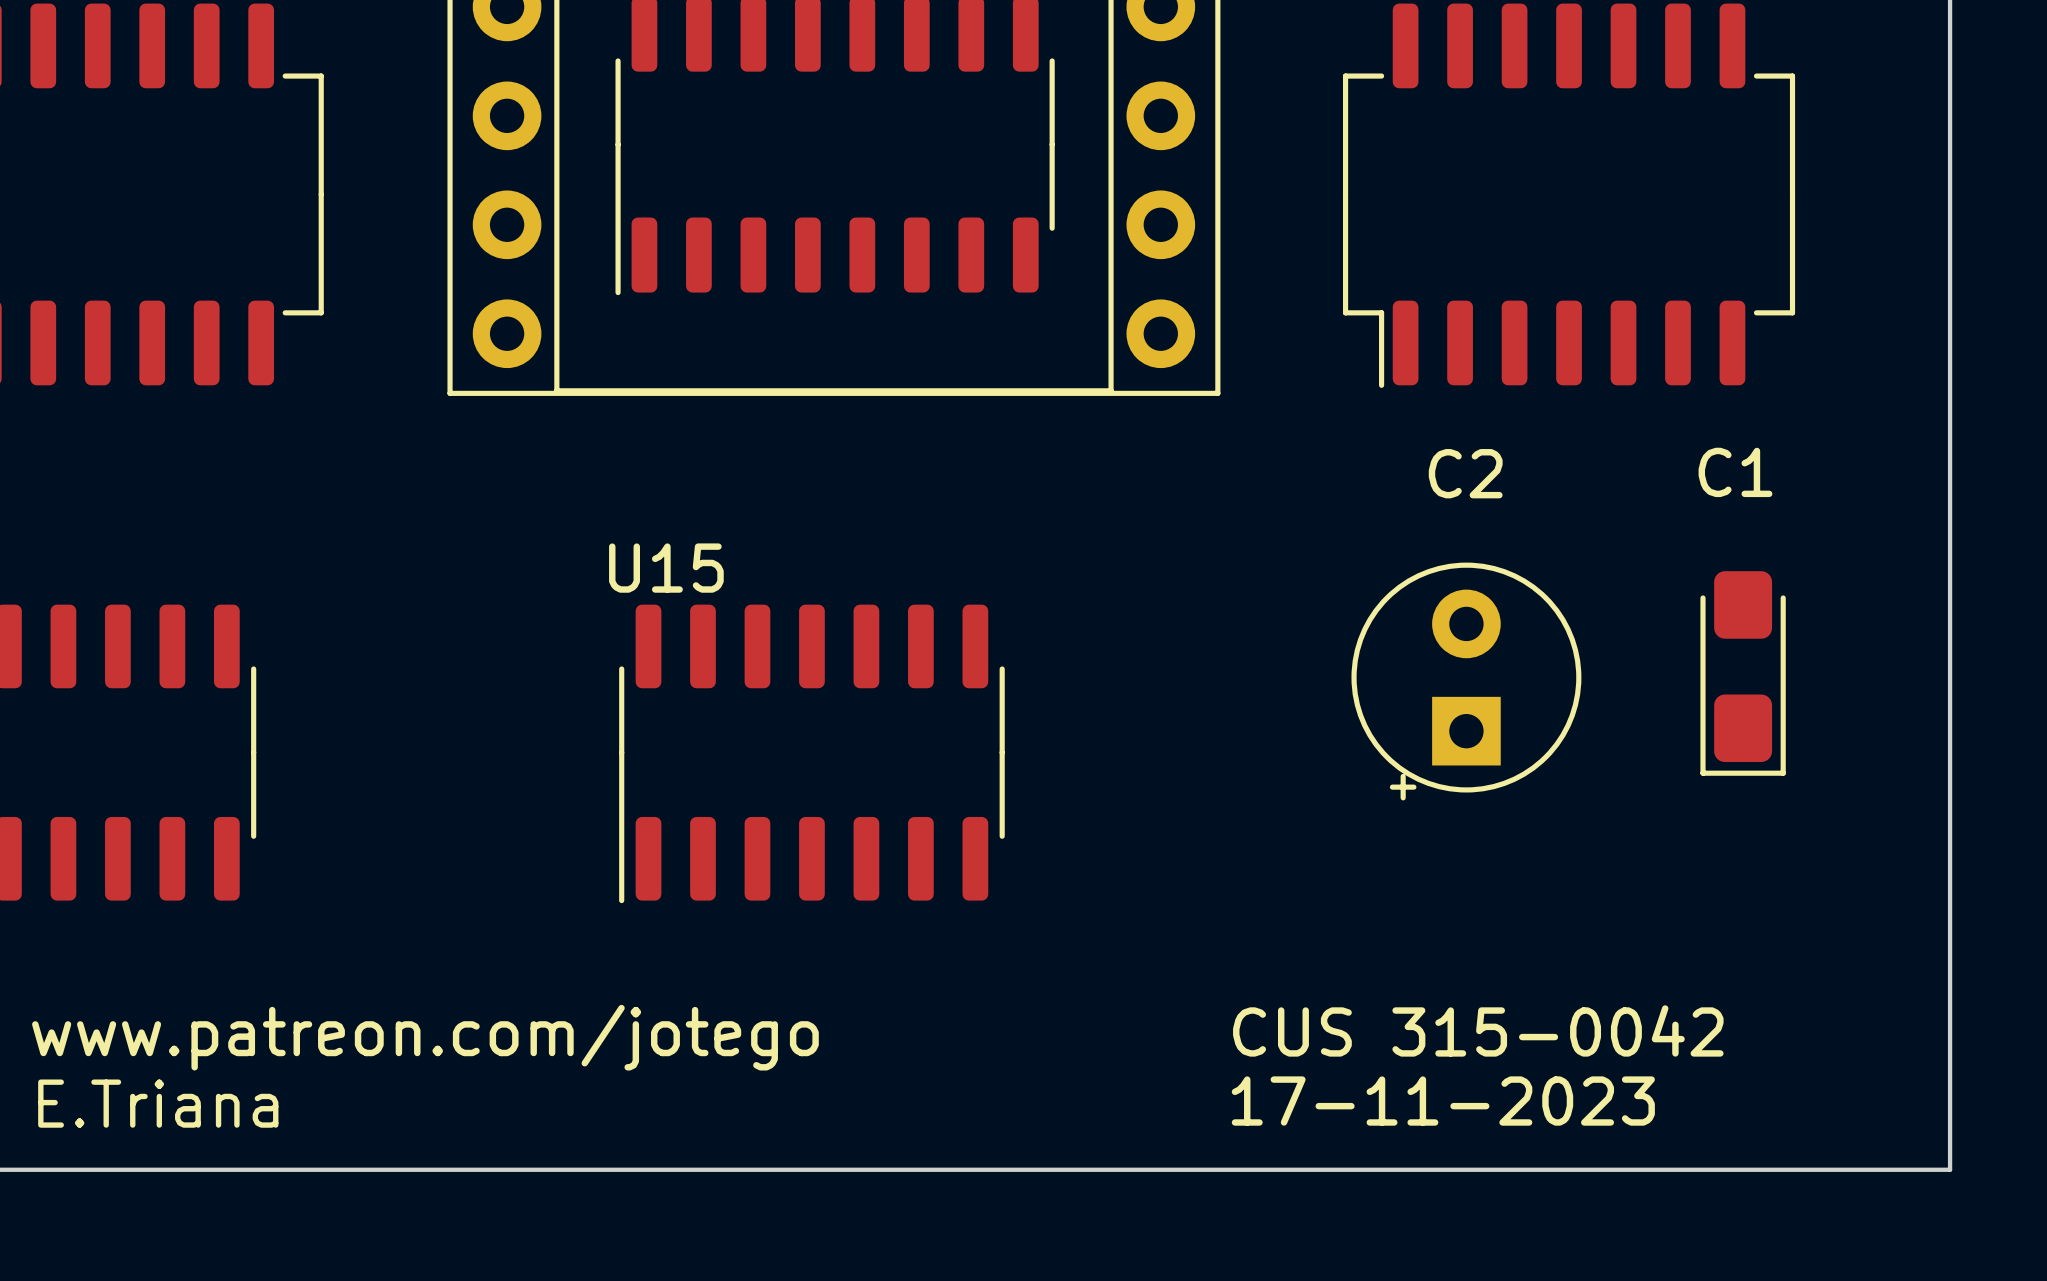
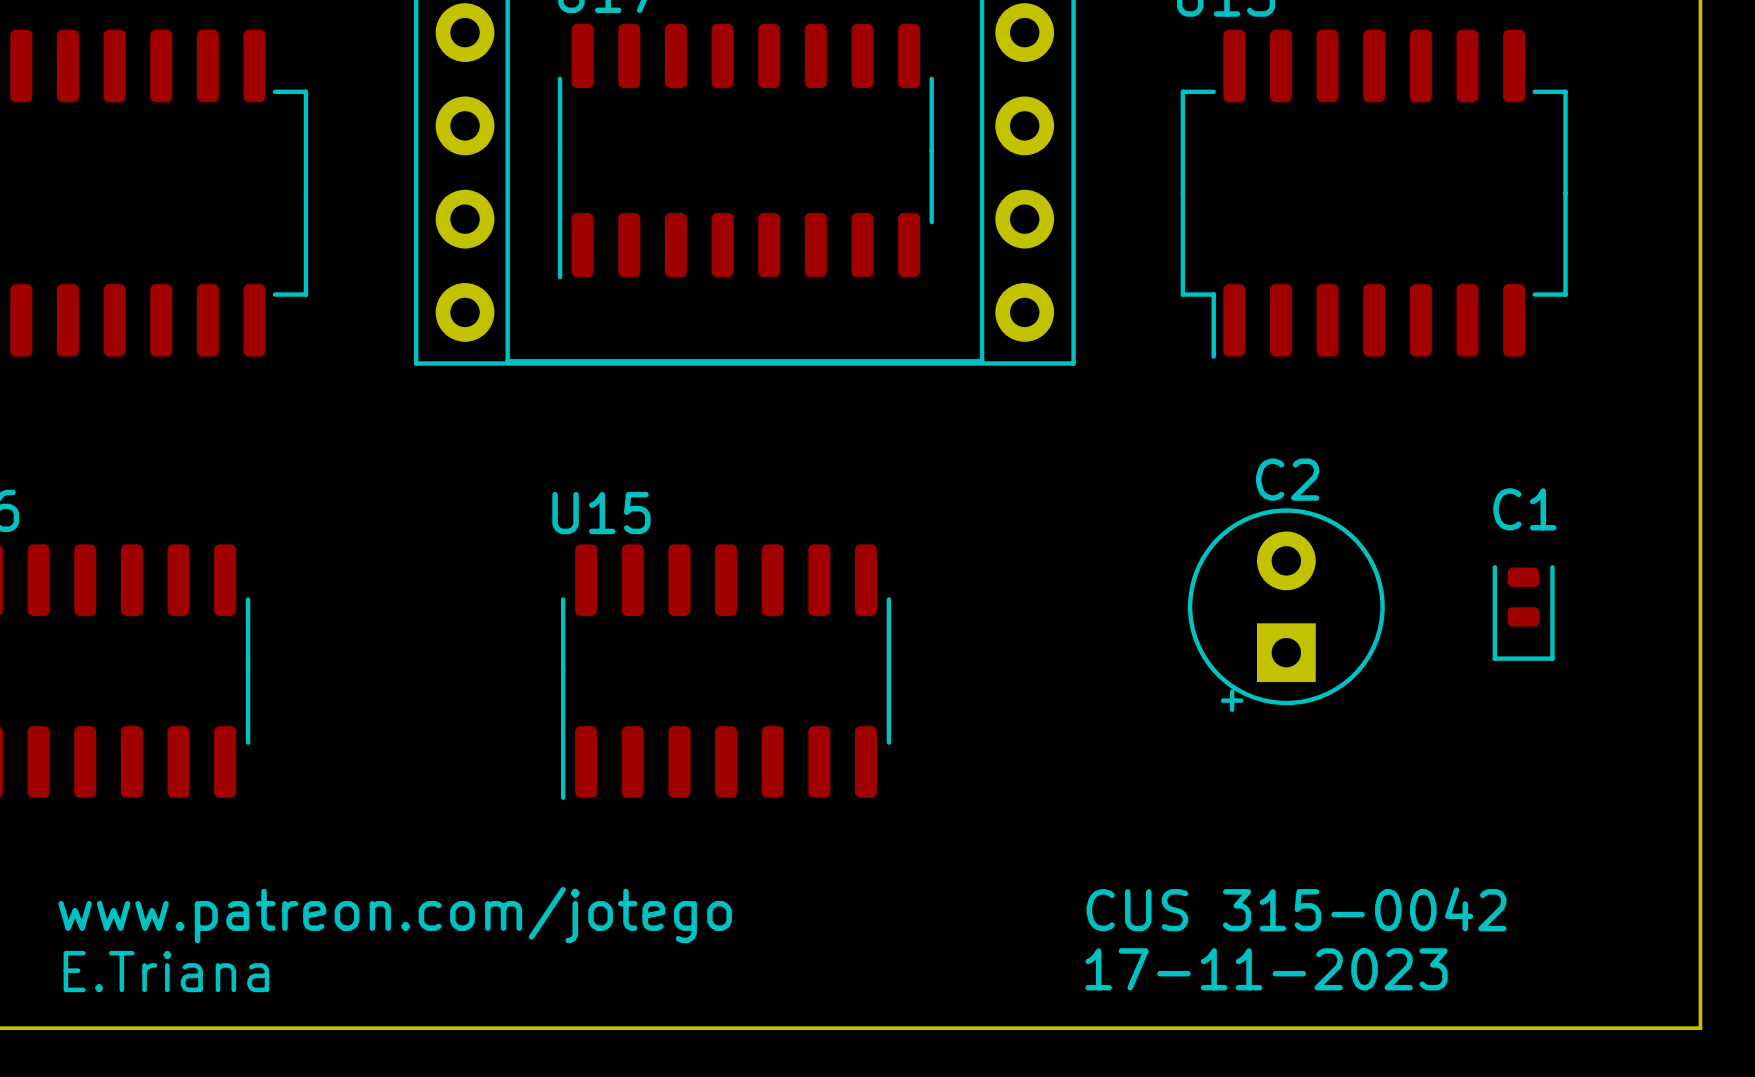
C2 name position: C2 (1465, 473) -> C2 (1287, 479)
C1 footprint: [1700, 571, 1786, 776] -> [1492, 565, 1555, 661]

